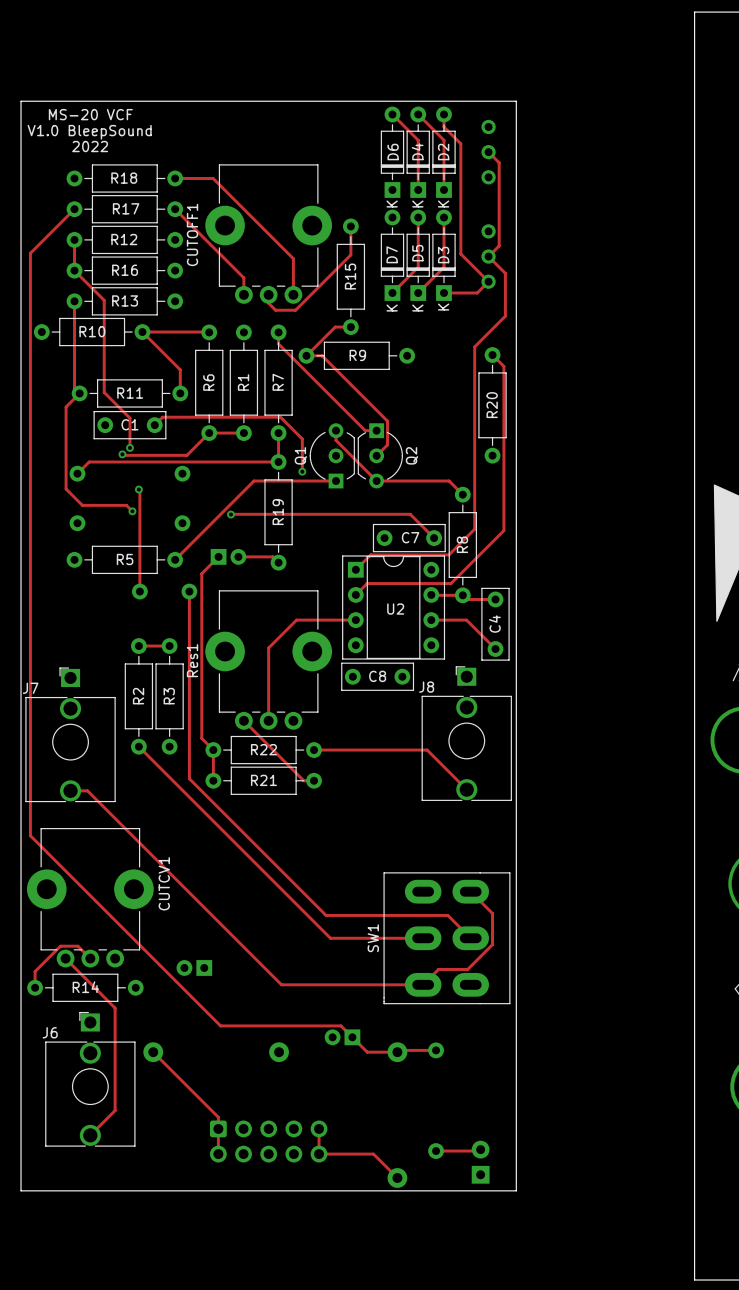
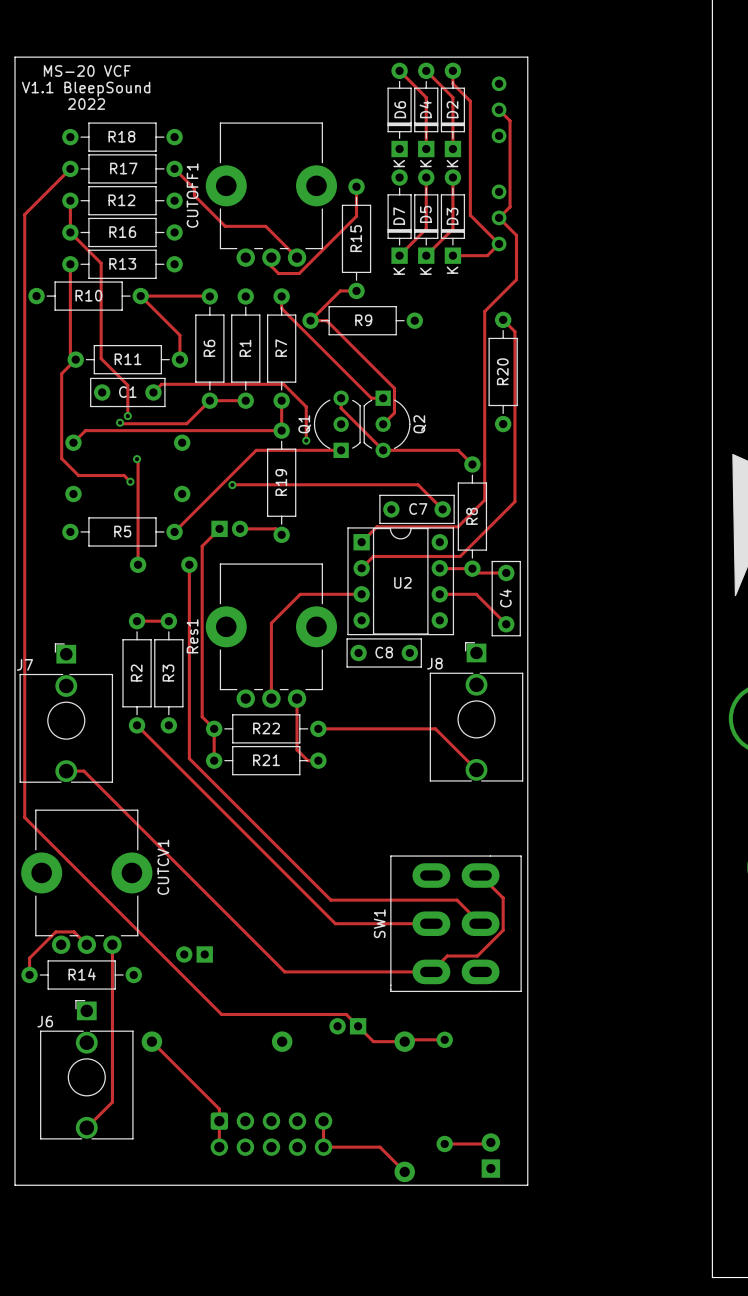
text: V1.0 BleepSound (89, 132) -> V1.1 BleepSound (86, 89)
track: (175, 178) (213, 178) (293, 258) (293, 294) -> none
track: (194, 228) (243, 277) (243, 294) -> (194, 188) (194, 195) (225, 226) (265, 226) (297, 257)
track: (243, 720) (293, 770) -> (297, 698) (297, 749)
track: (65, 958) (115, 1008) -> (112, 944) (112, 996)

